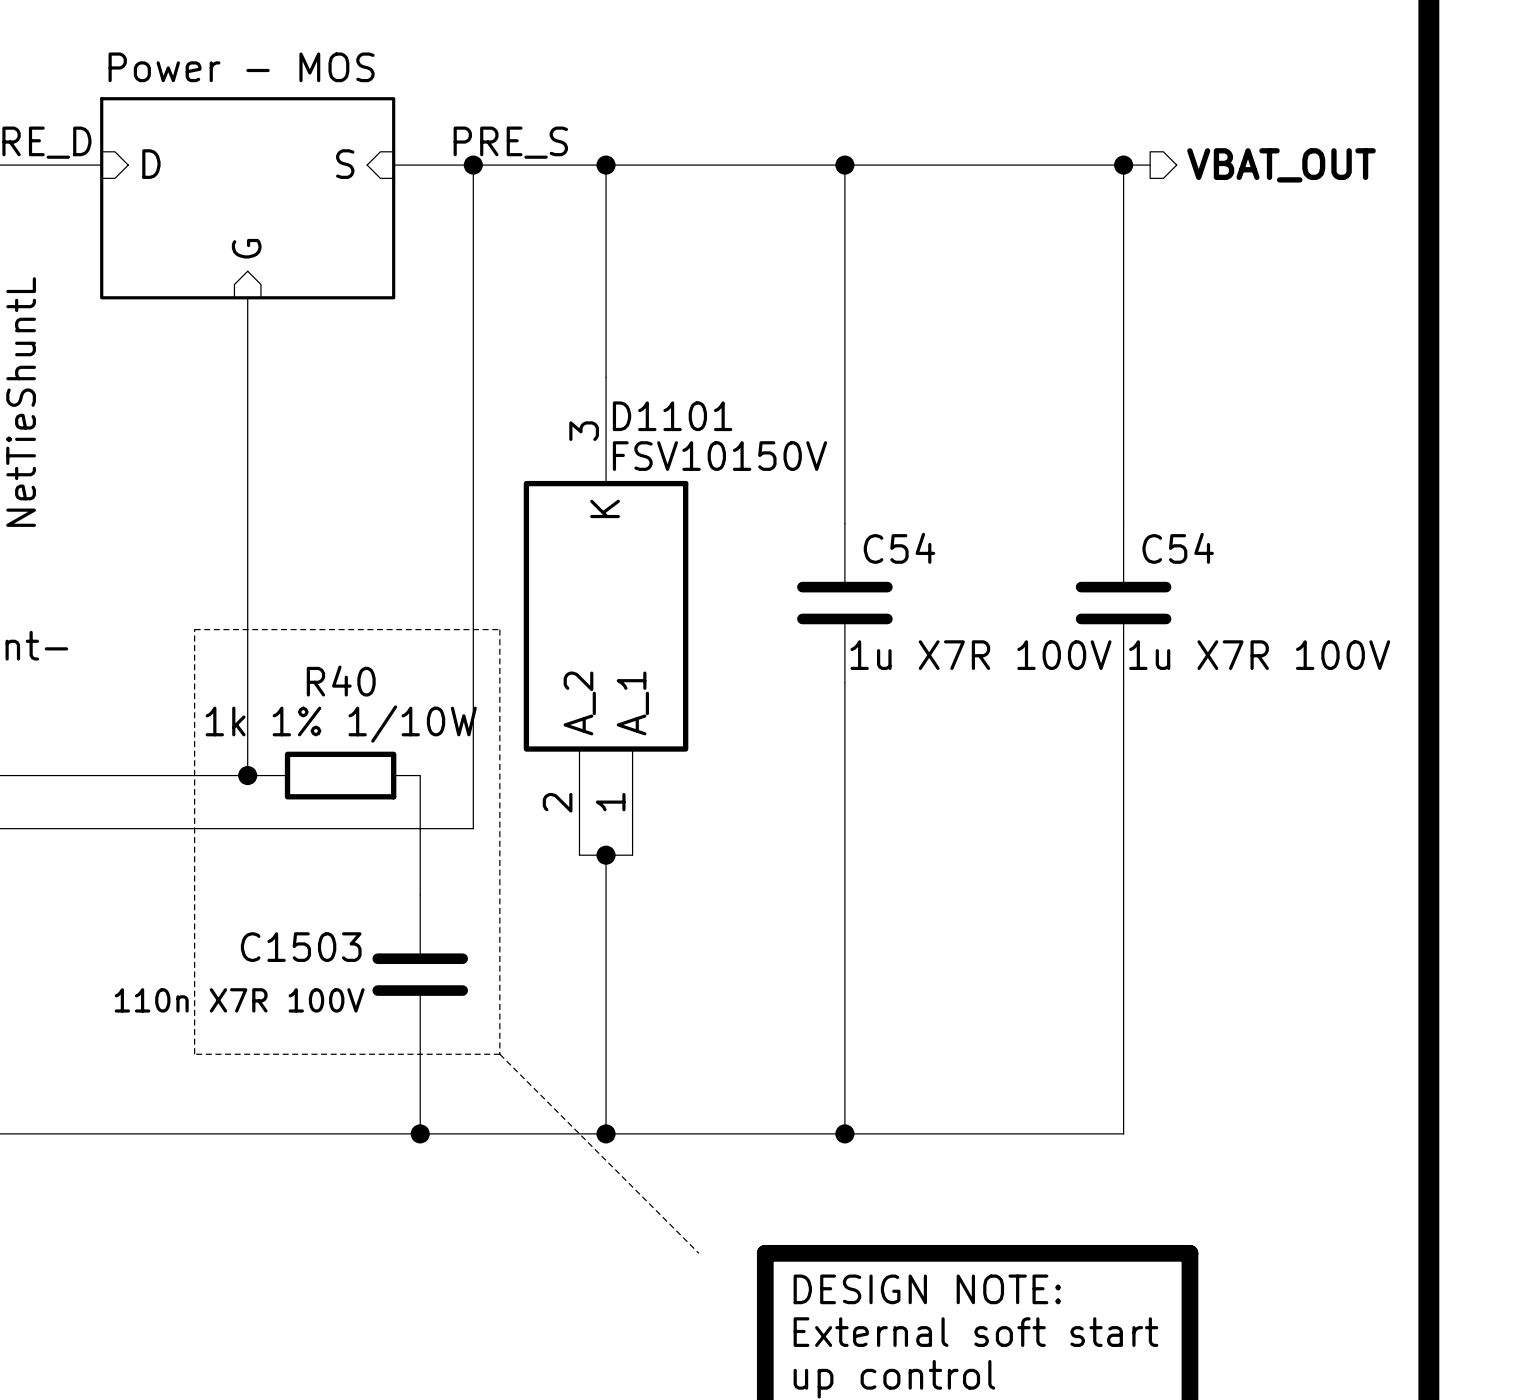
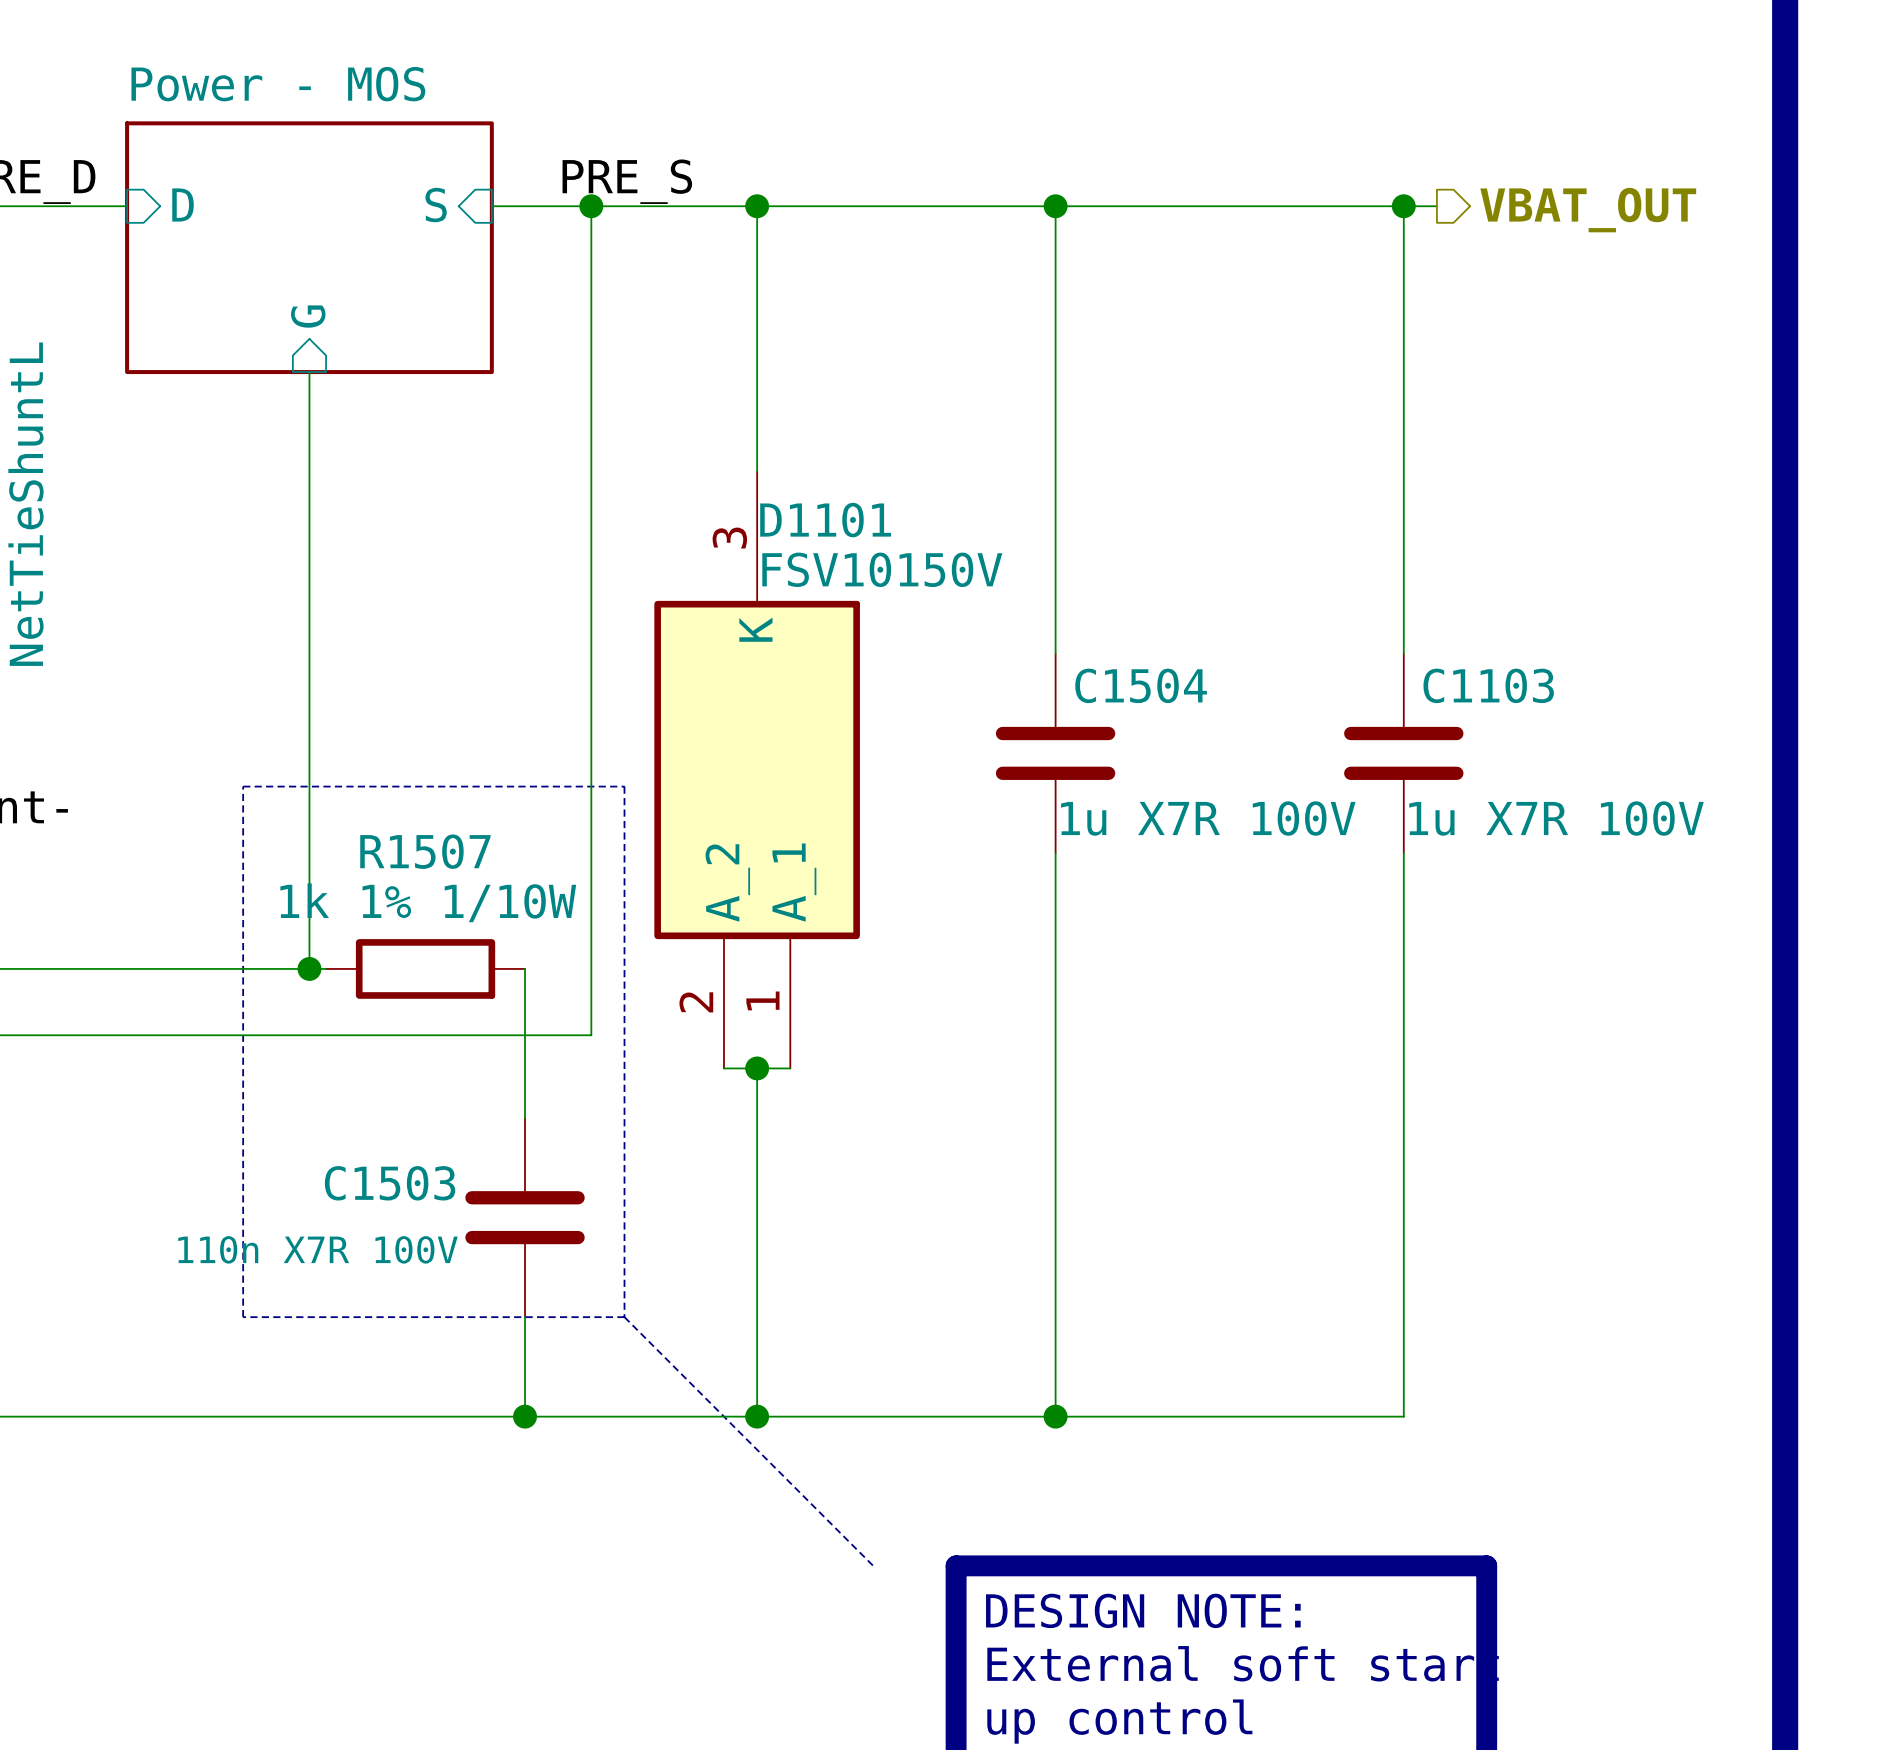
C54 name: C54 (899, 548) -> C1504 (1141, 685)
C54 name: C54 (1178, 548) -> C1103 (1488, 685)
R40 name: R40 (341, 681) -> R1507 (425, 851)

